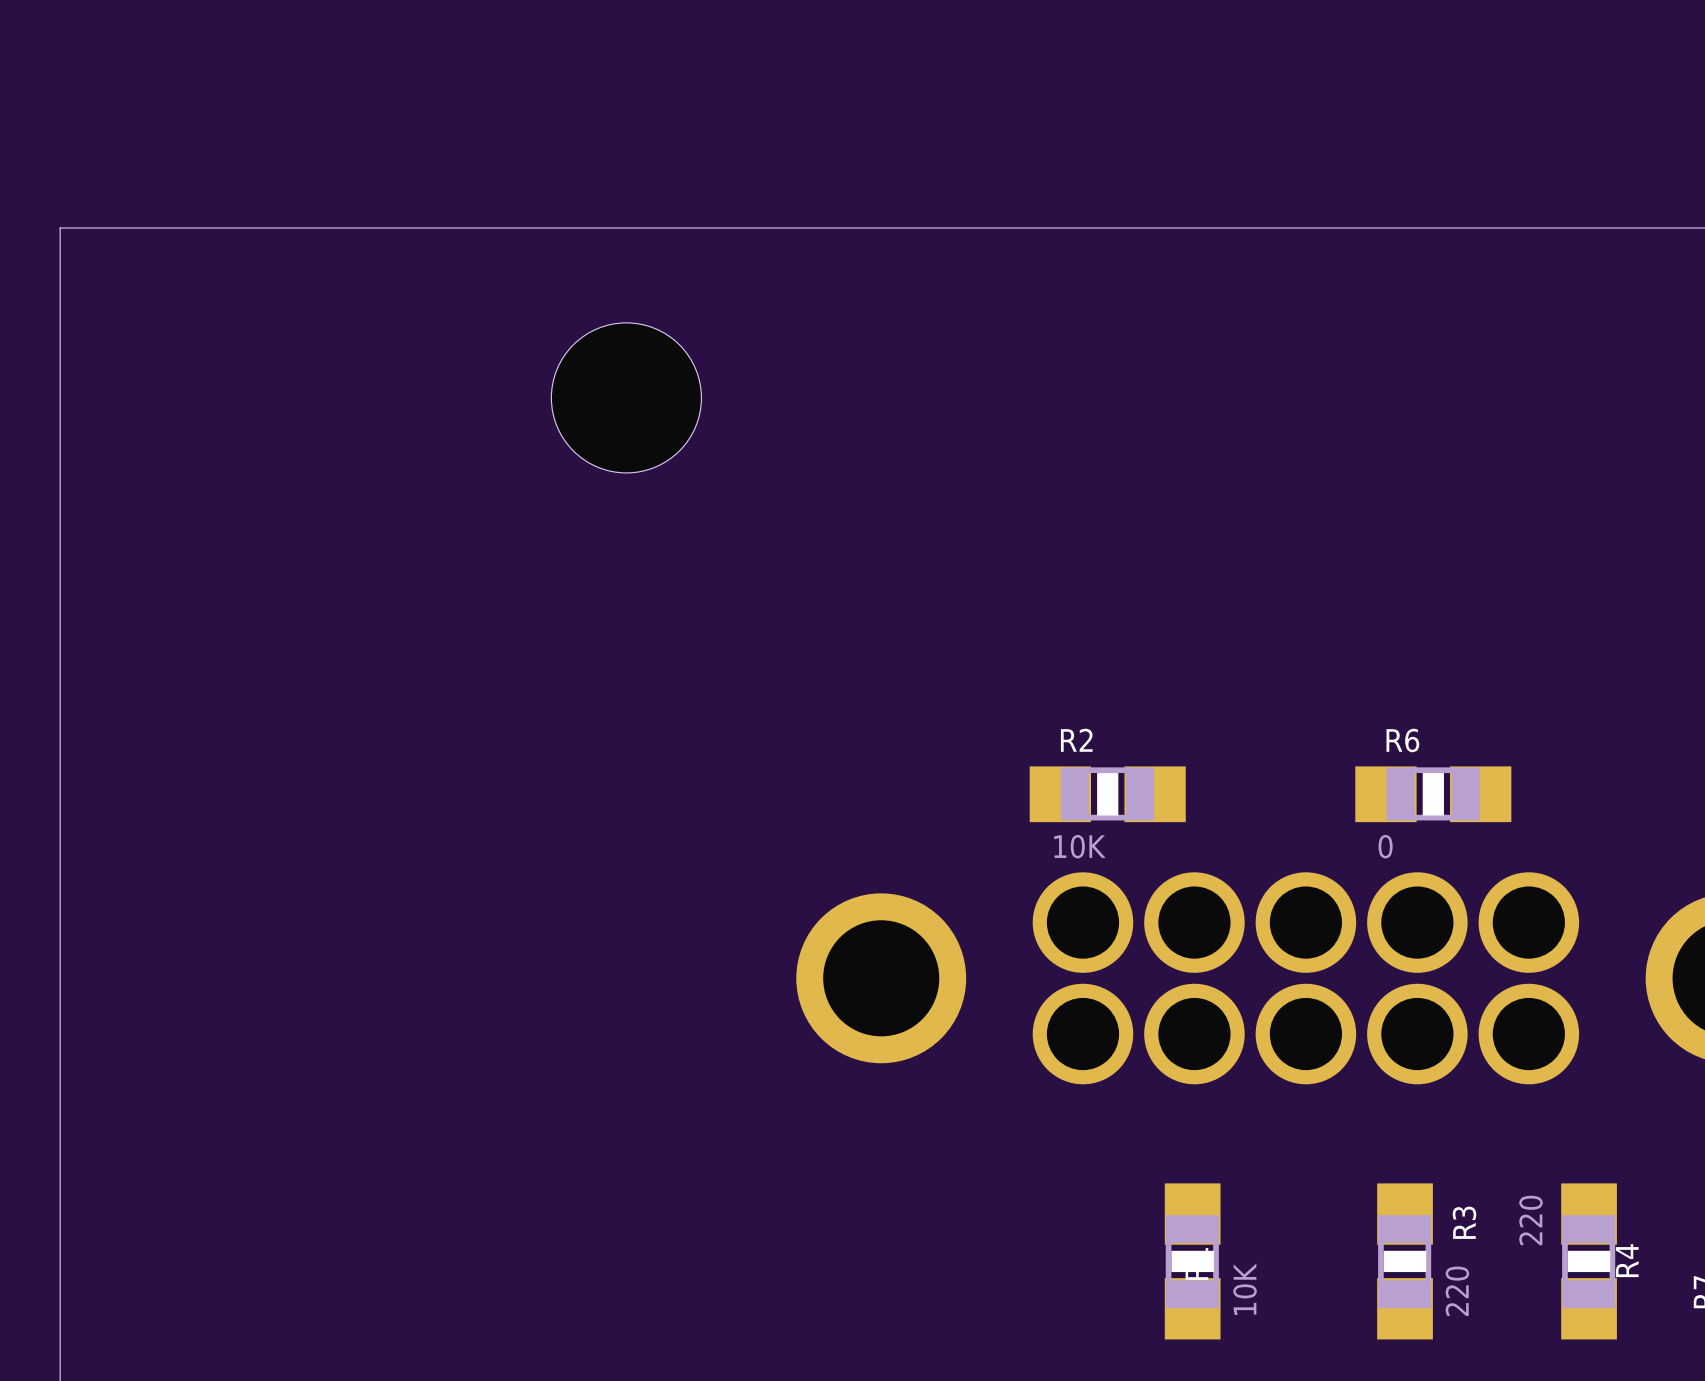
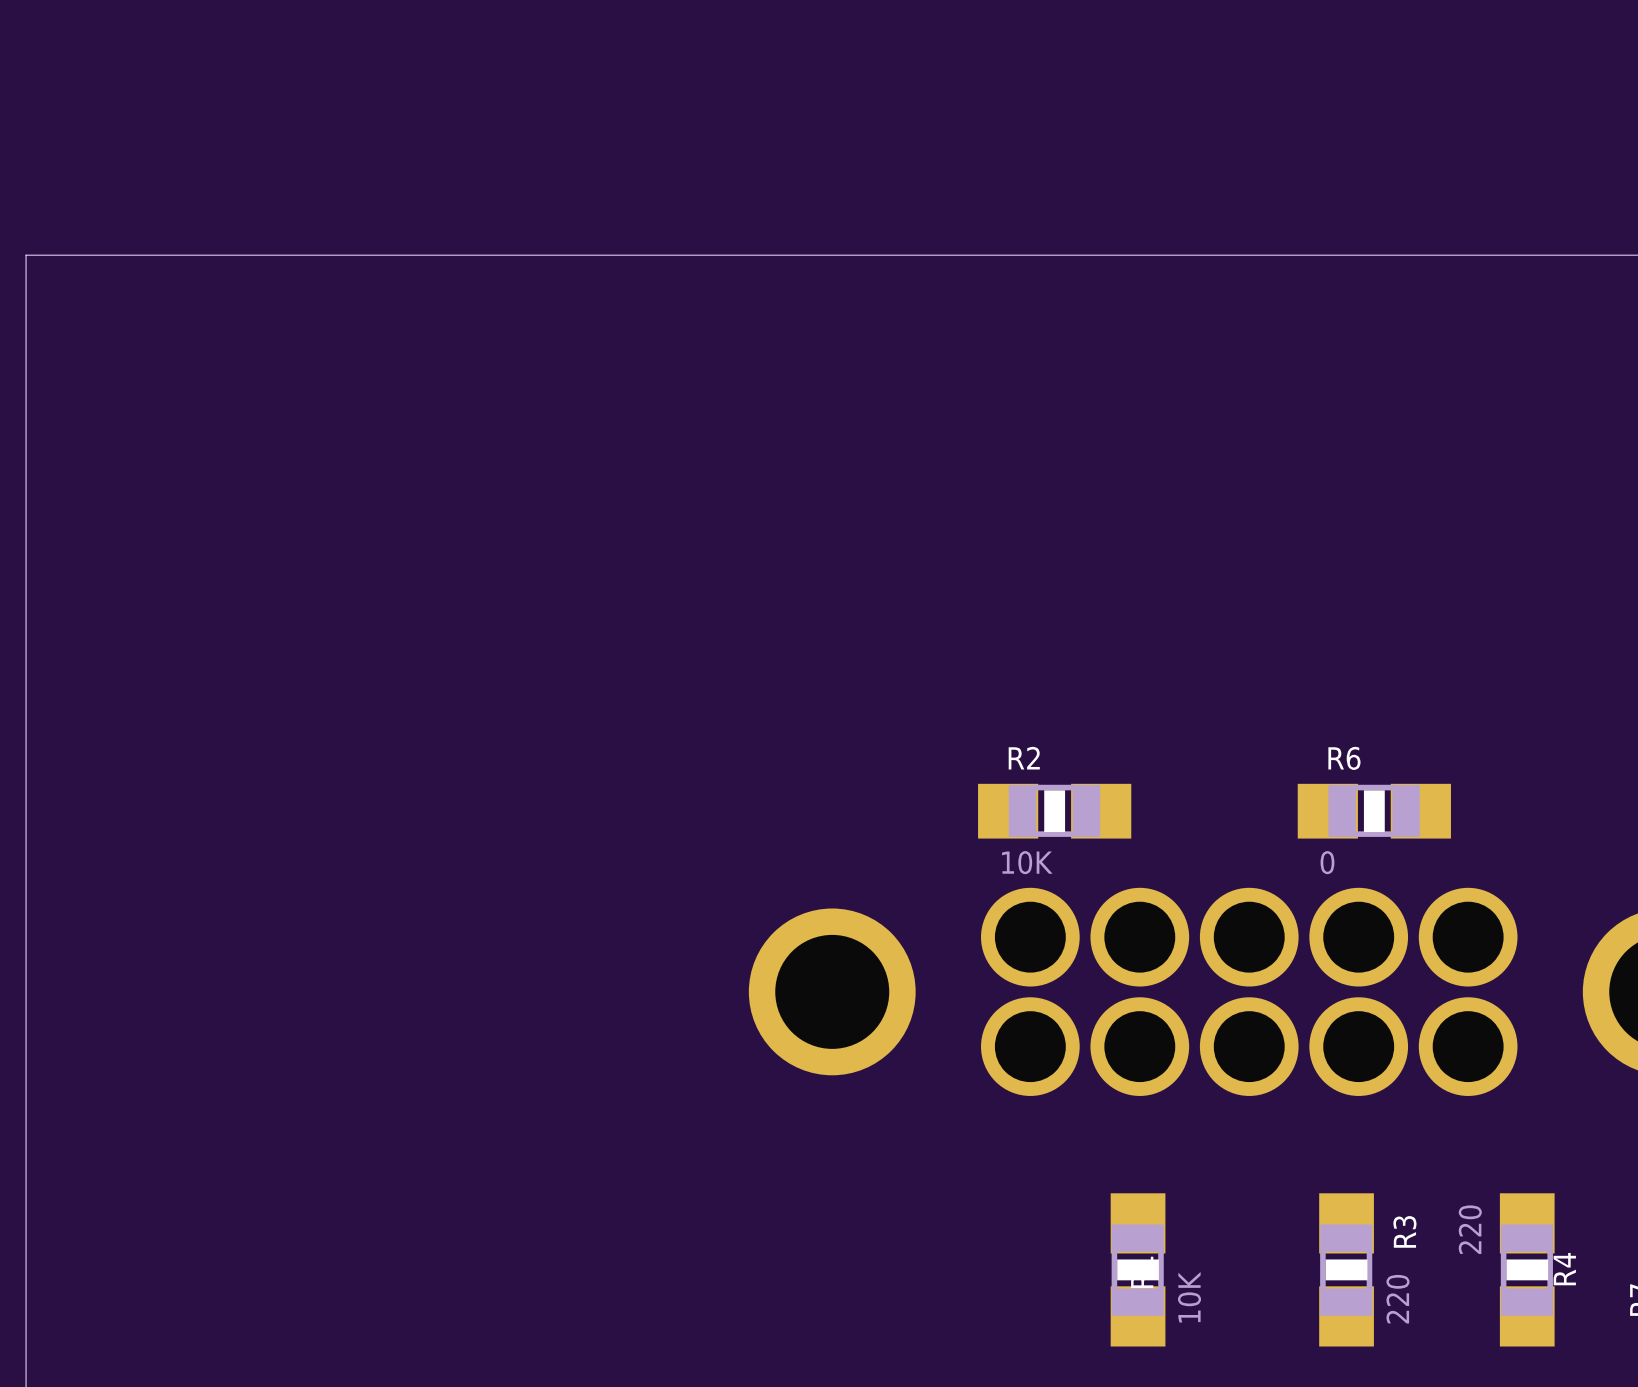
hole: (626, 397) -> none

